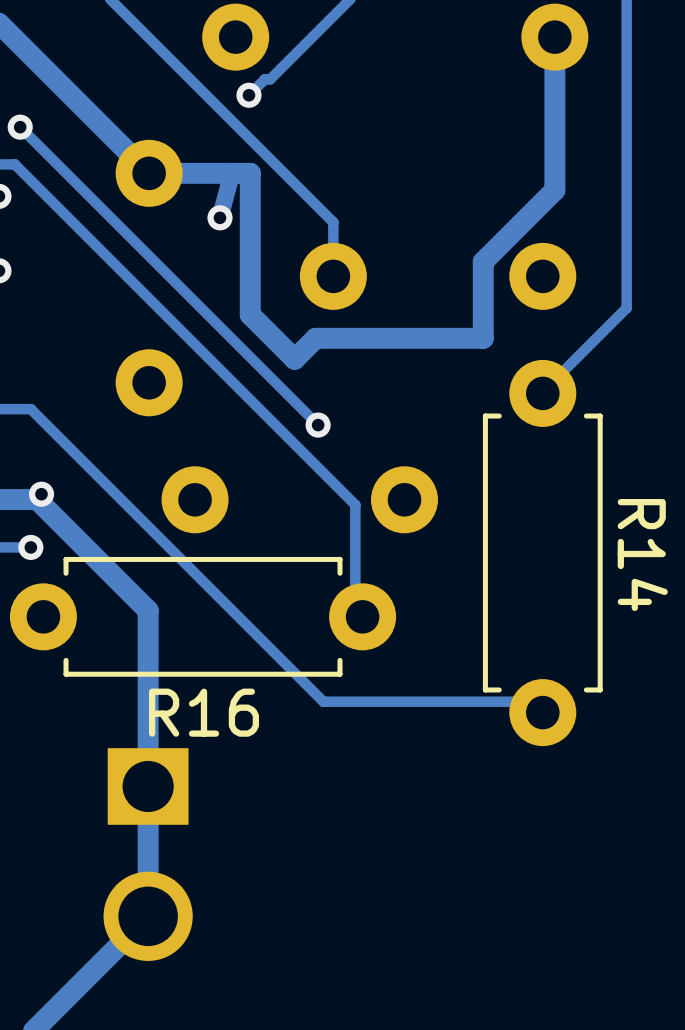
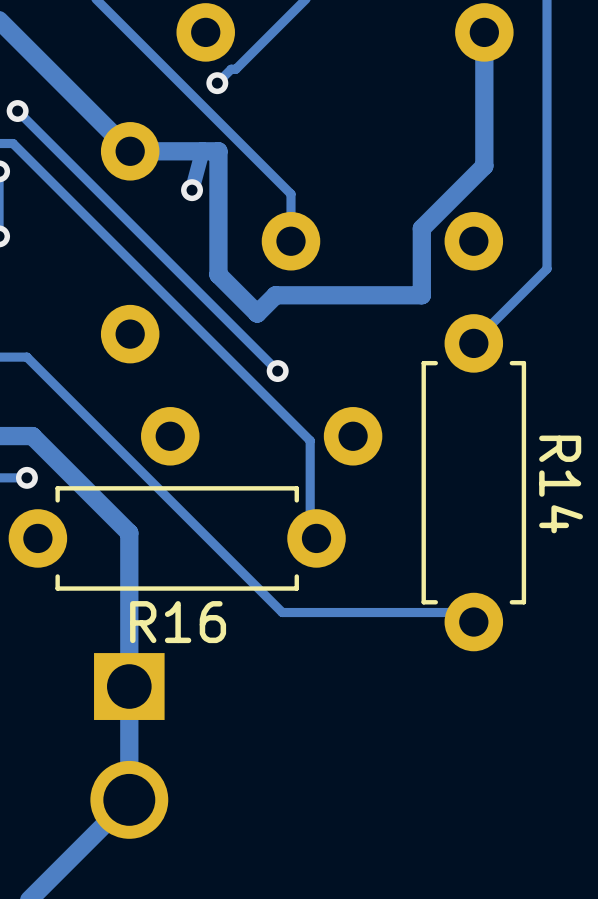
via: (41, 494) -> none

